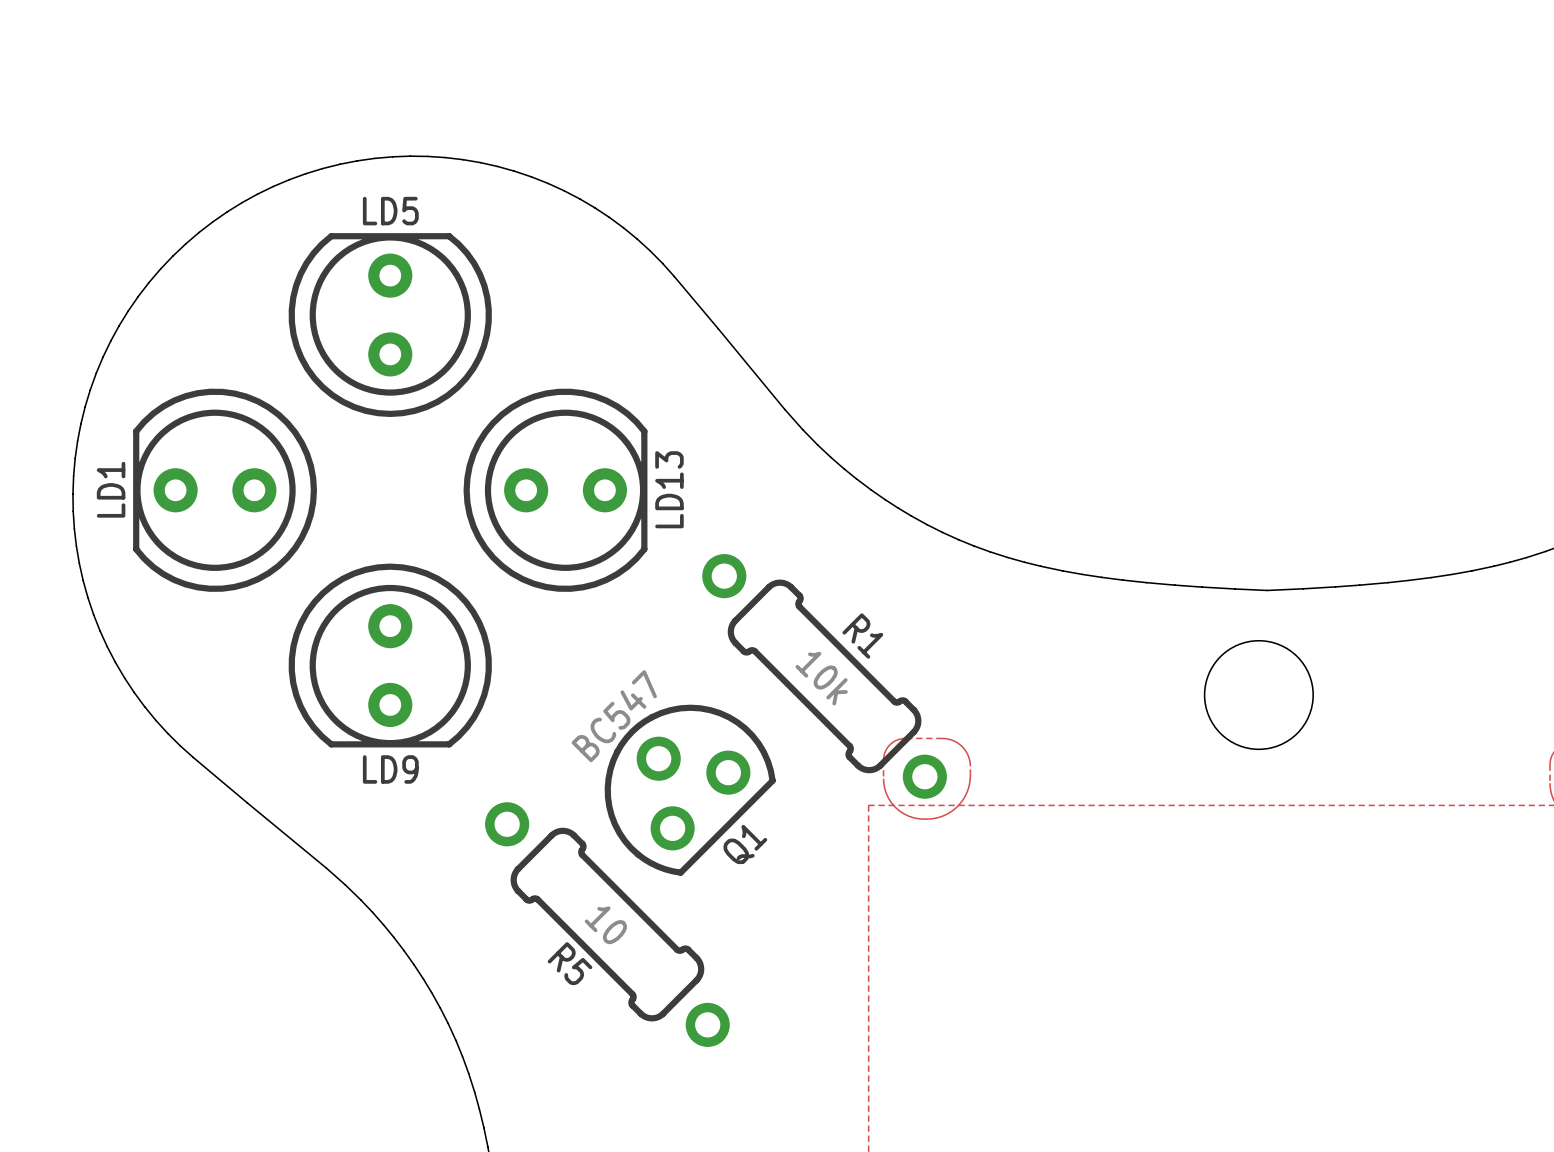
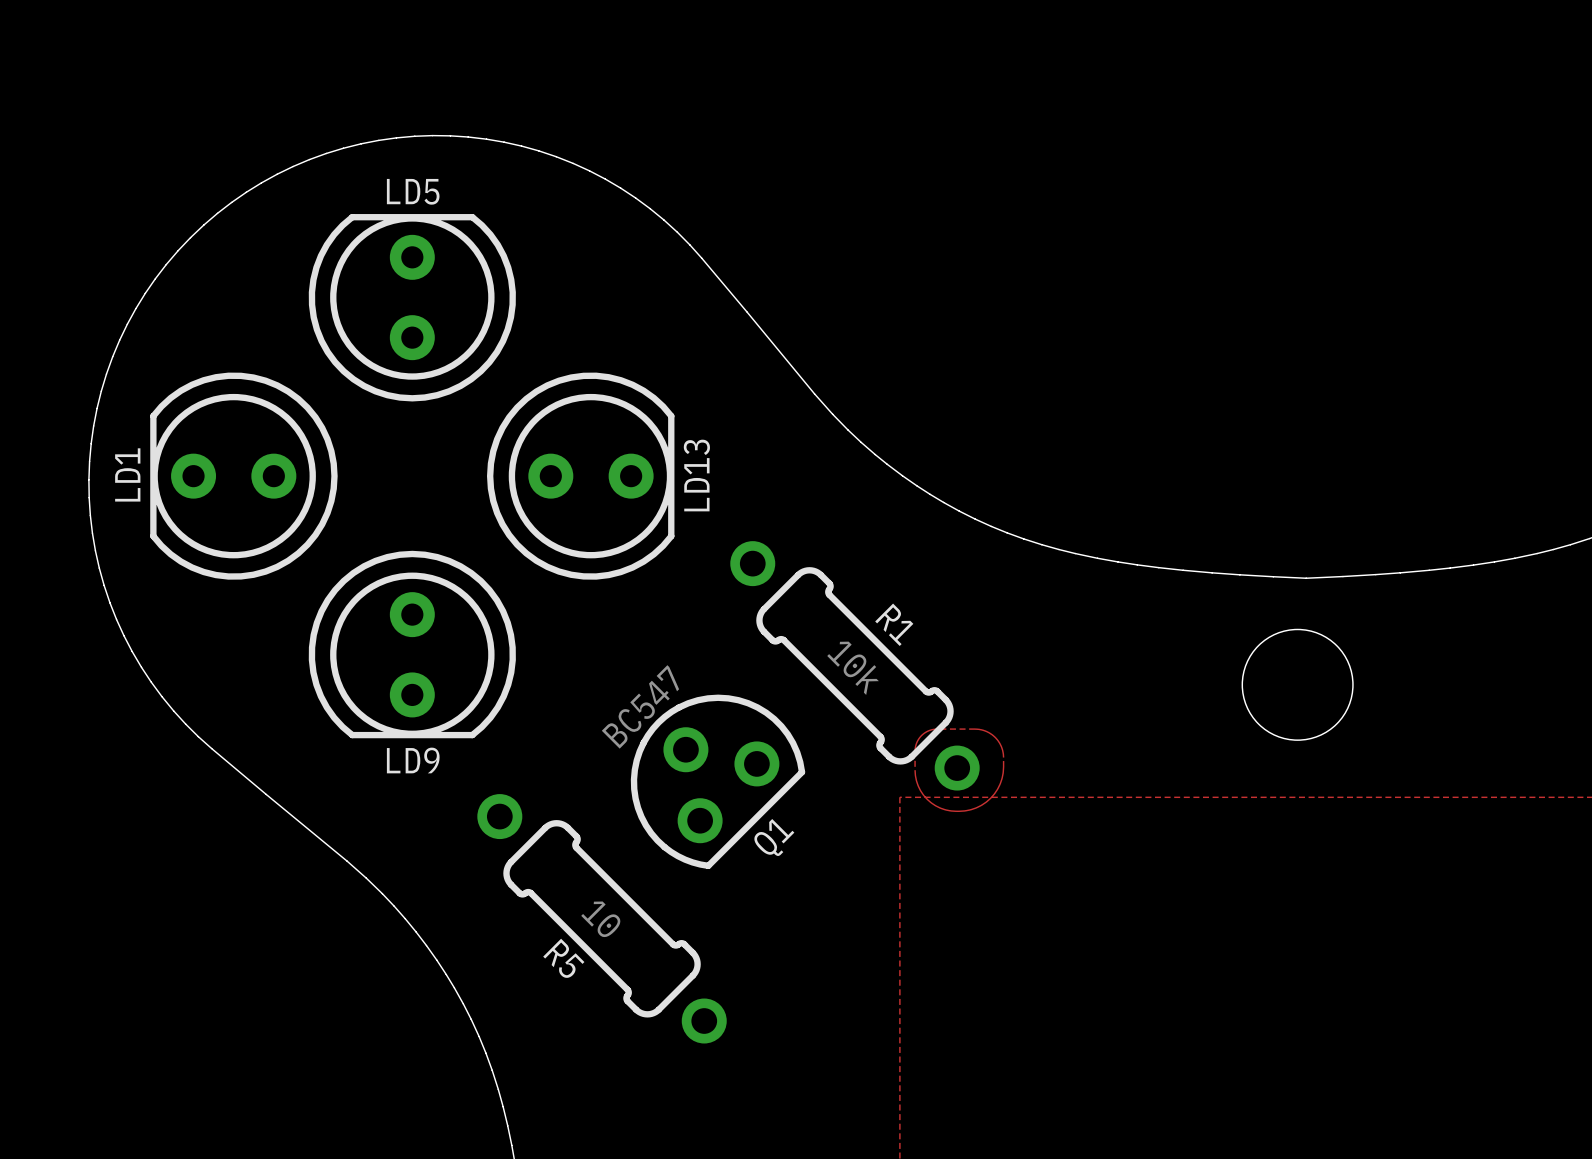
R5 position: (607, 924) -> (602, 918)

